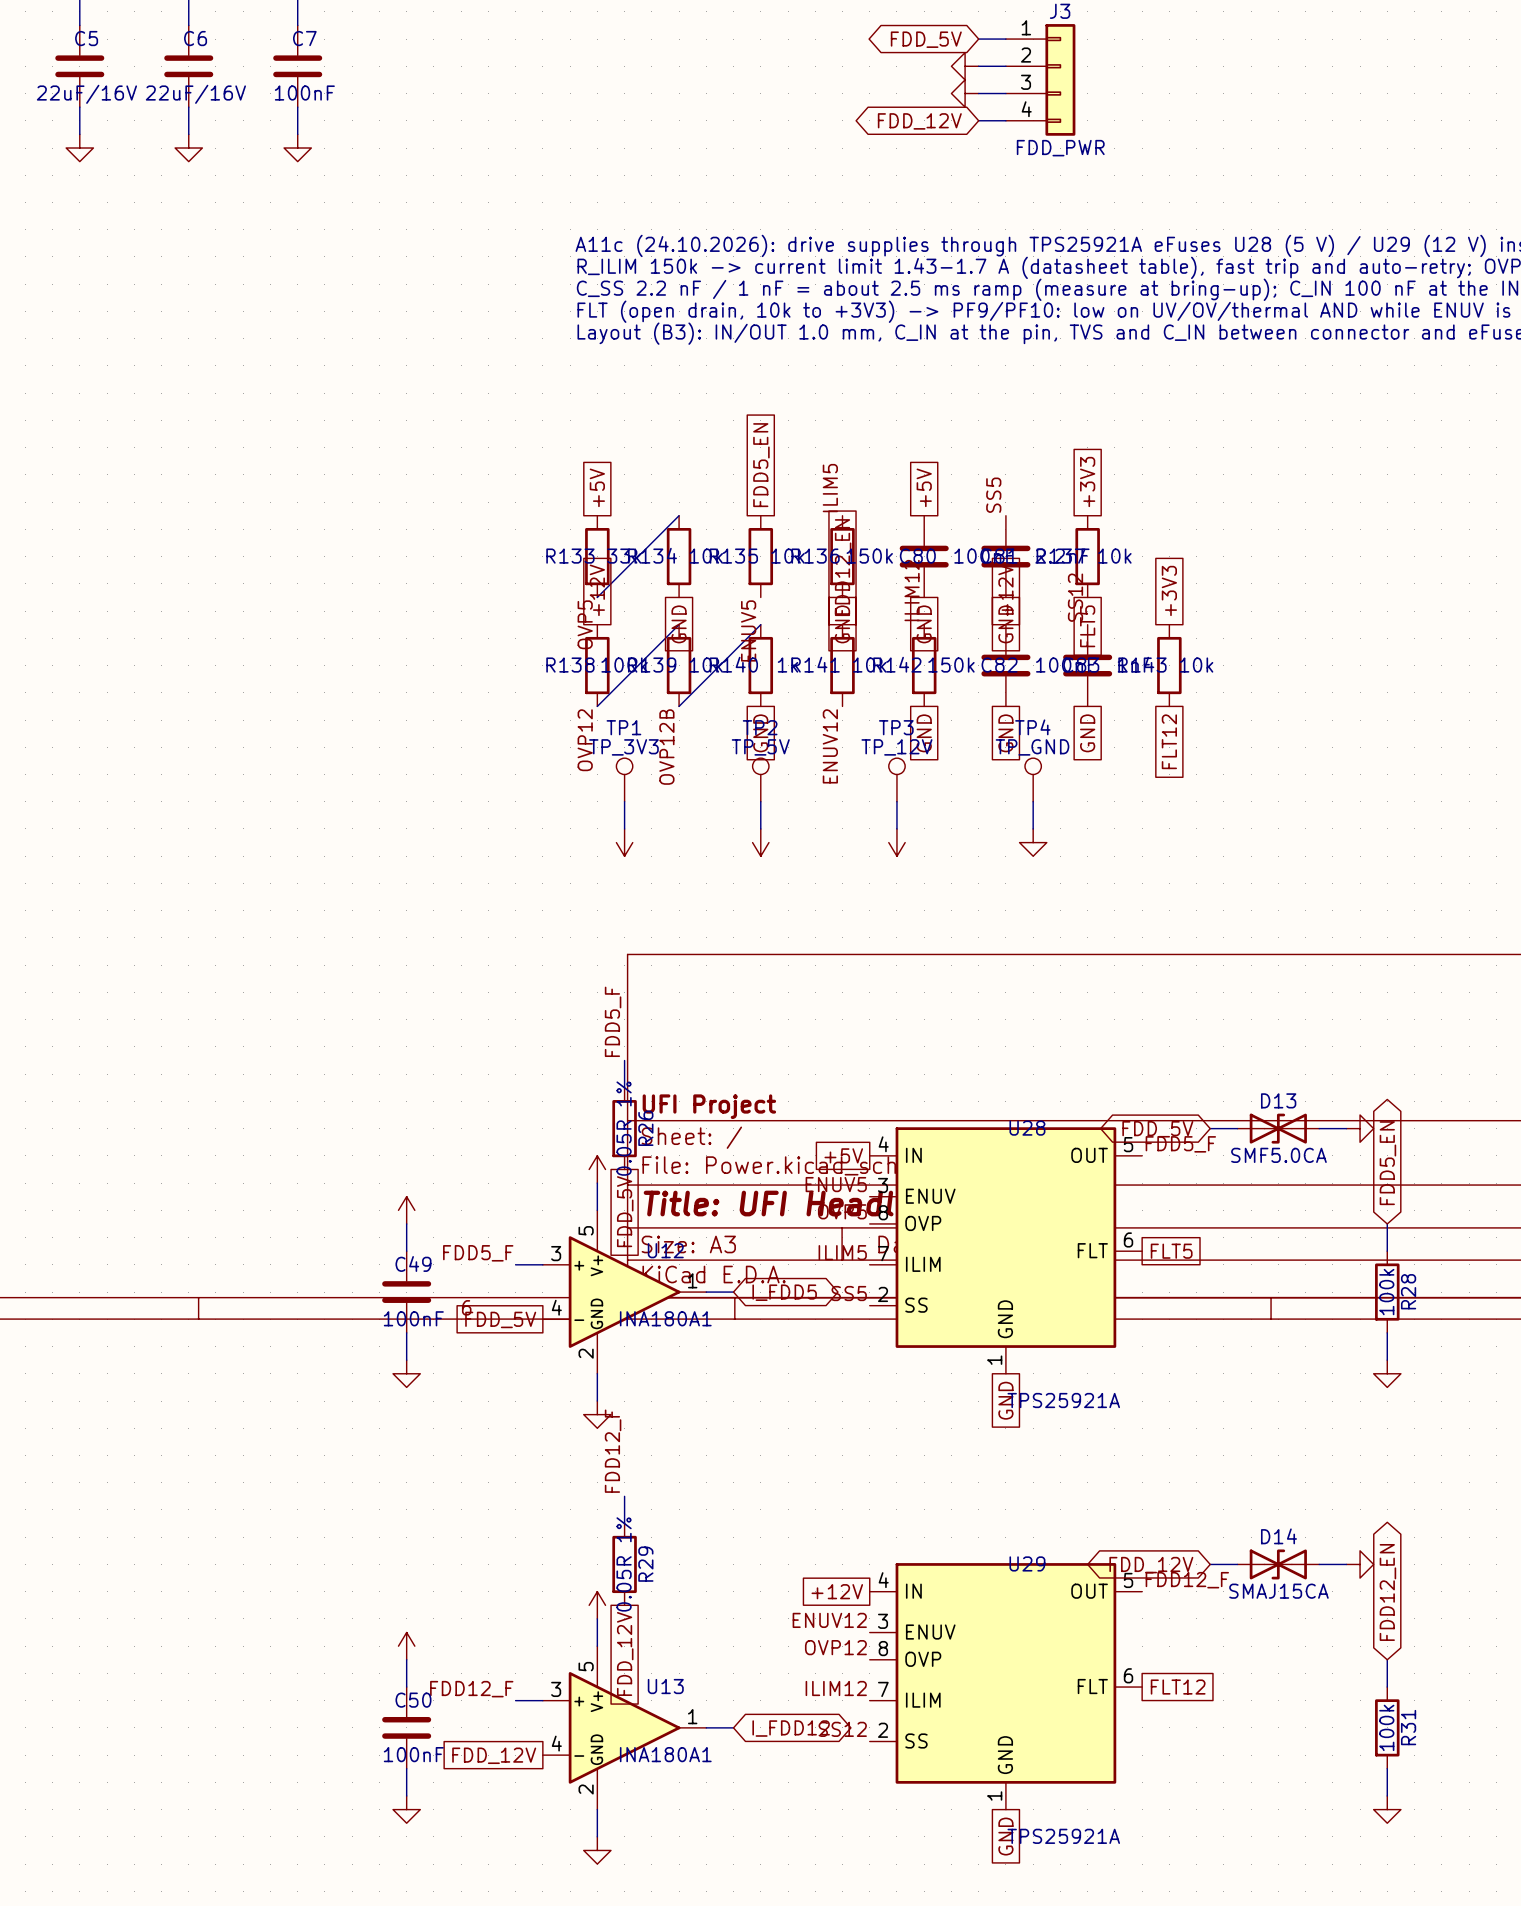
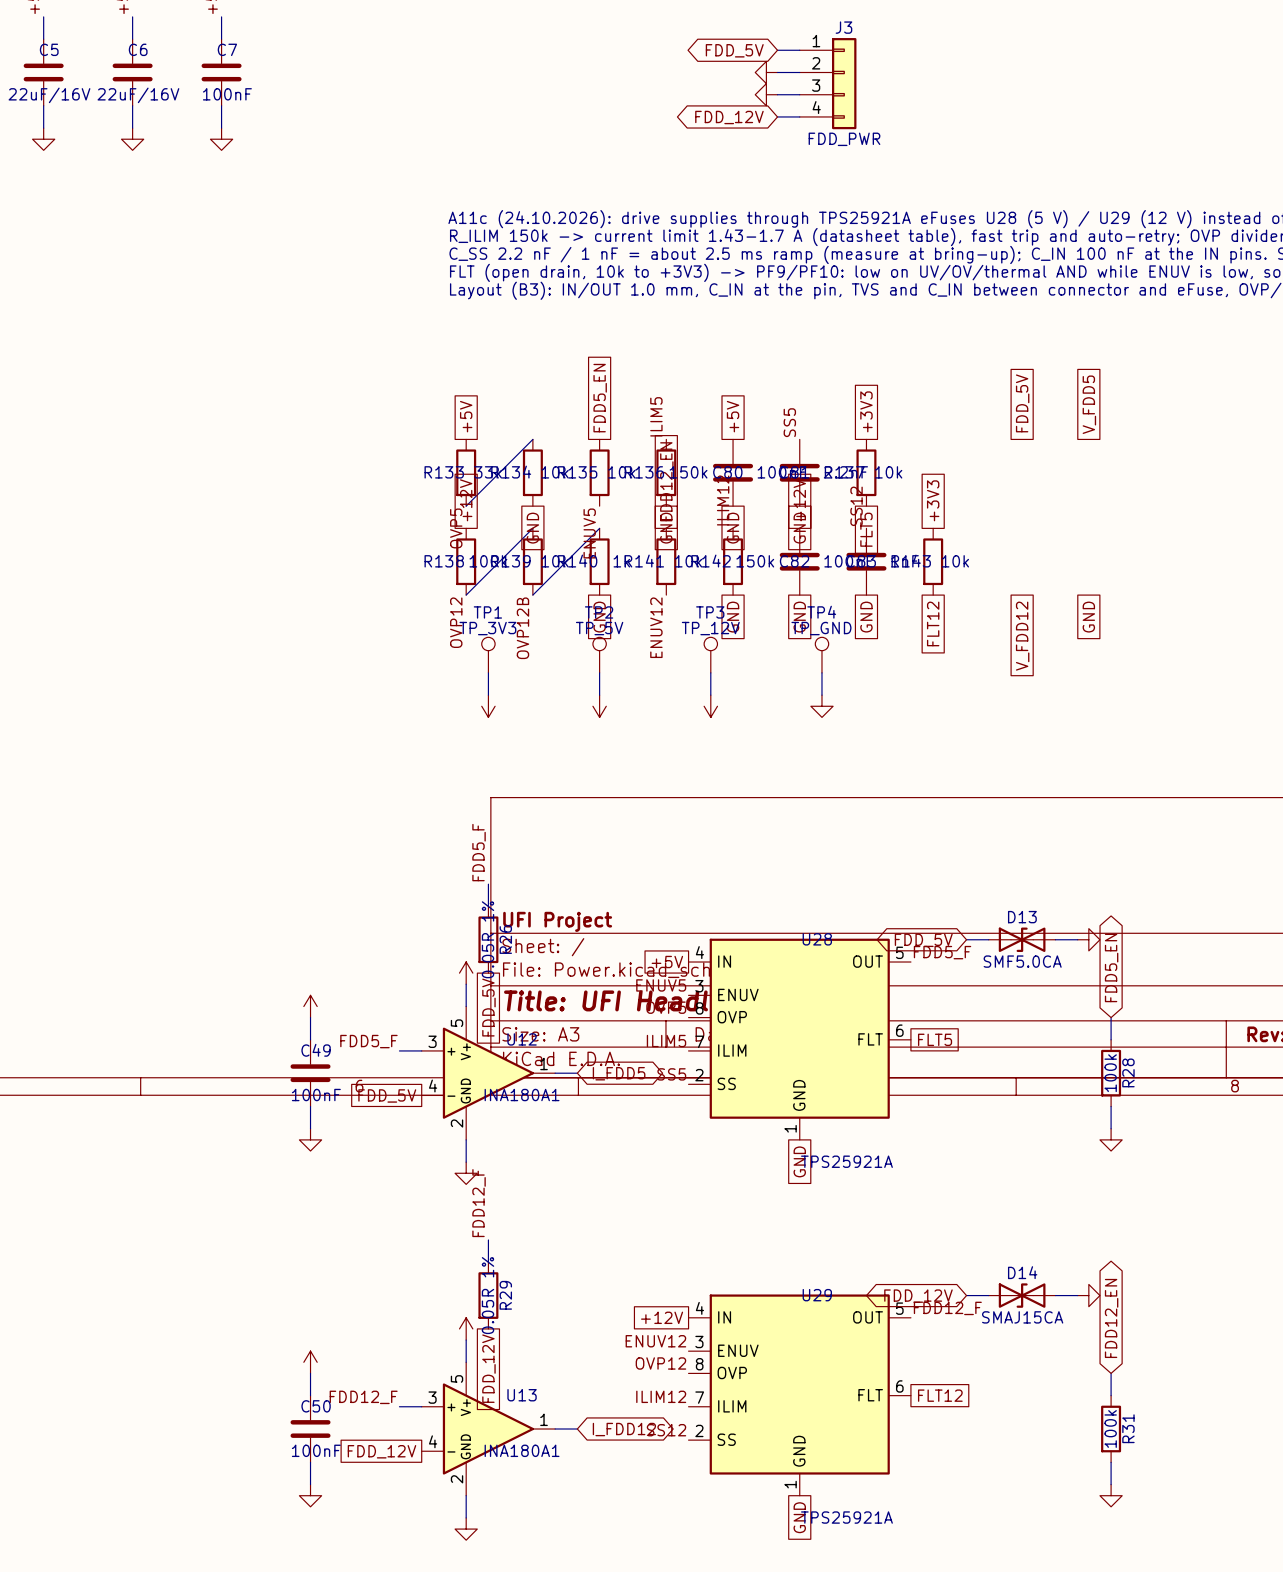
global label: none -> FDD_5V (1022, 403)
global label: none -> V_FDD5 (1089, 404)
global label: none -> GND (1088, 617)
global label: none -> V_FDD12 (1022, 636)

